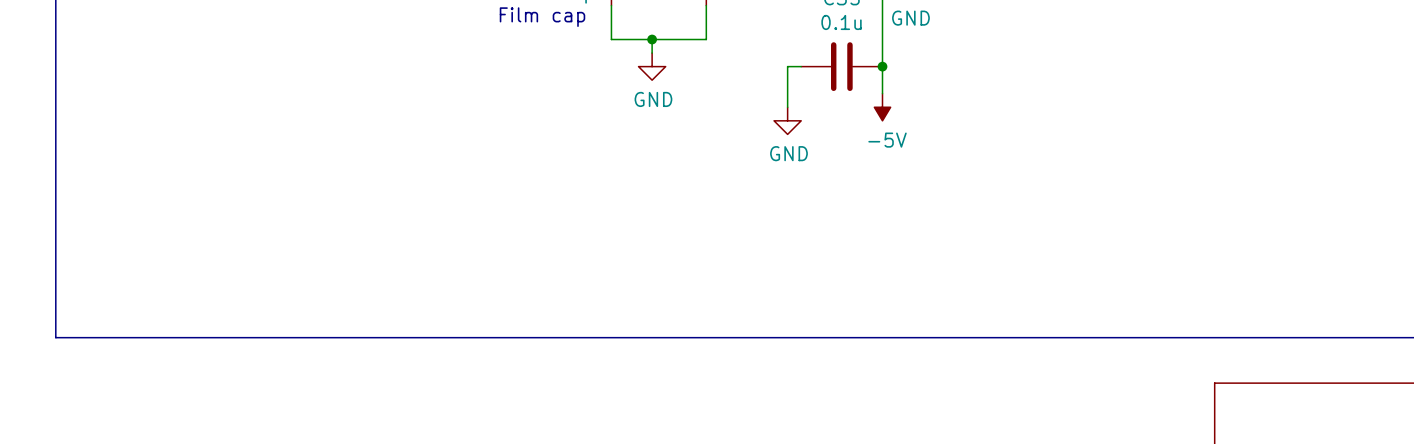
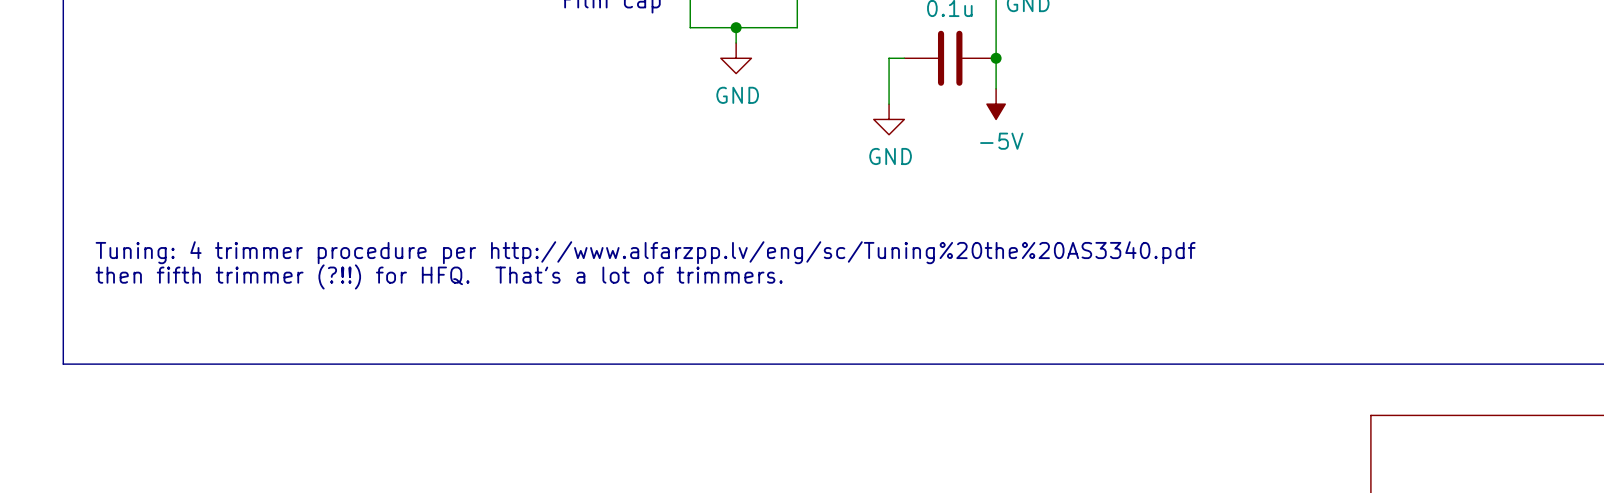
text: none -> Tuning: 4 trimmer procedure per http://www.alfarzpp.lv/eng/sc/Tuning%20the%20AS3340.pdf (645, 252)
text: none -> then fifth trimmer (?!!) for HFQ. That's a lot of trimmers. (439, 276)

